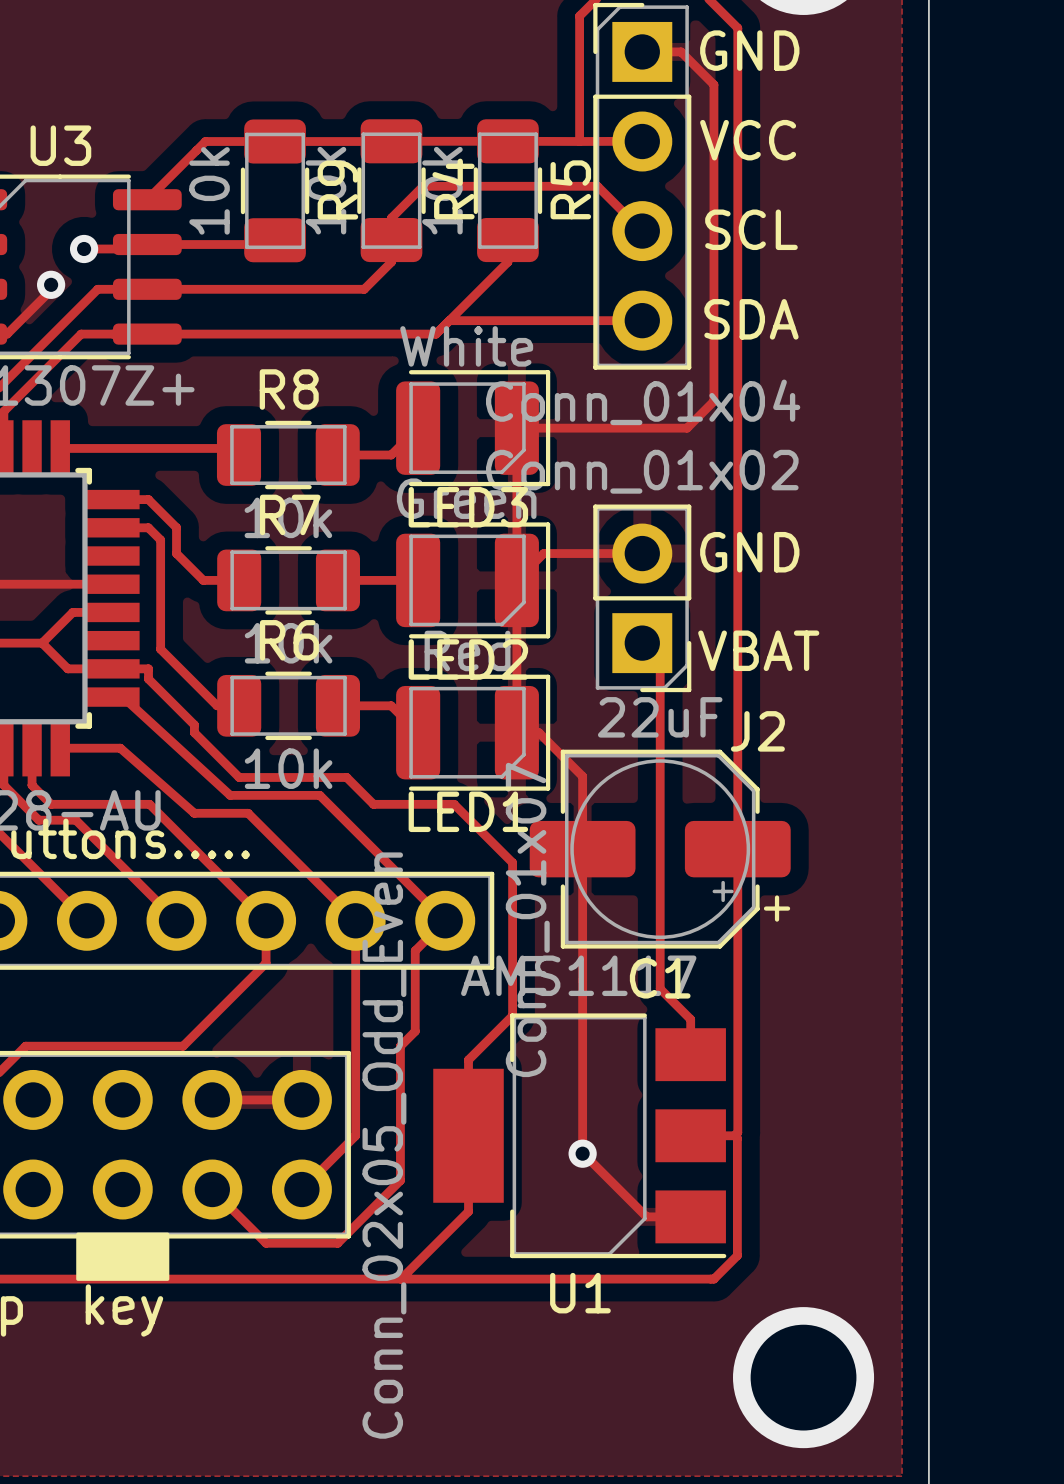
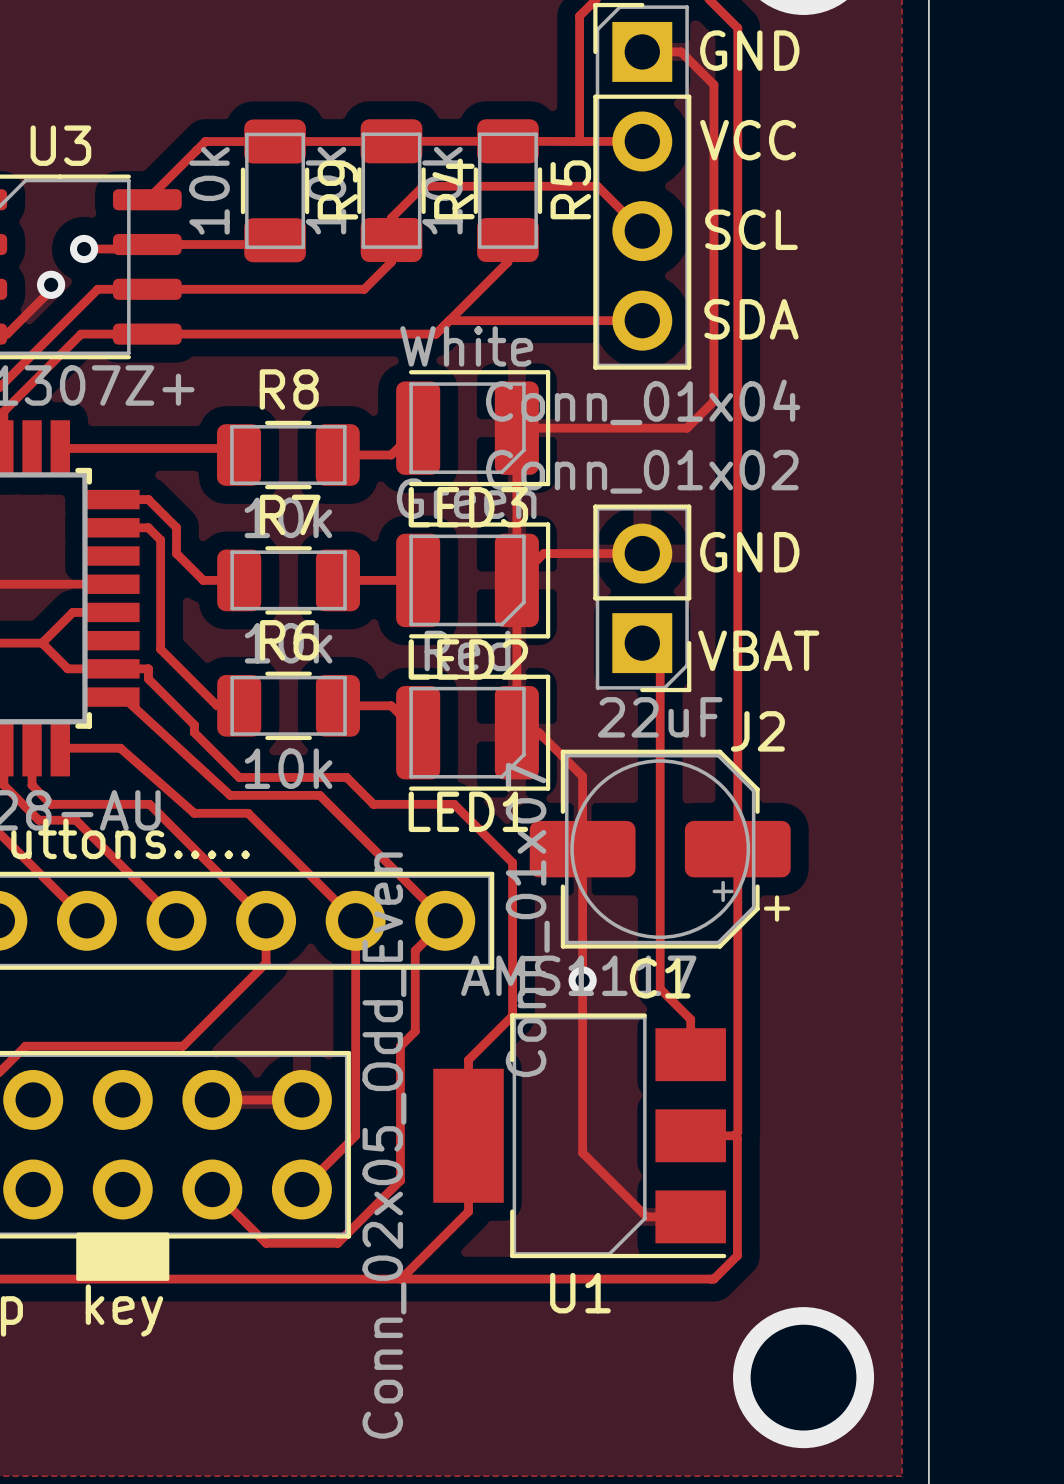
via position: (582, 1153) -> (582, 980)

